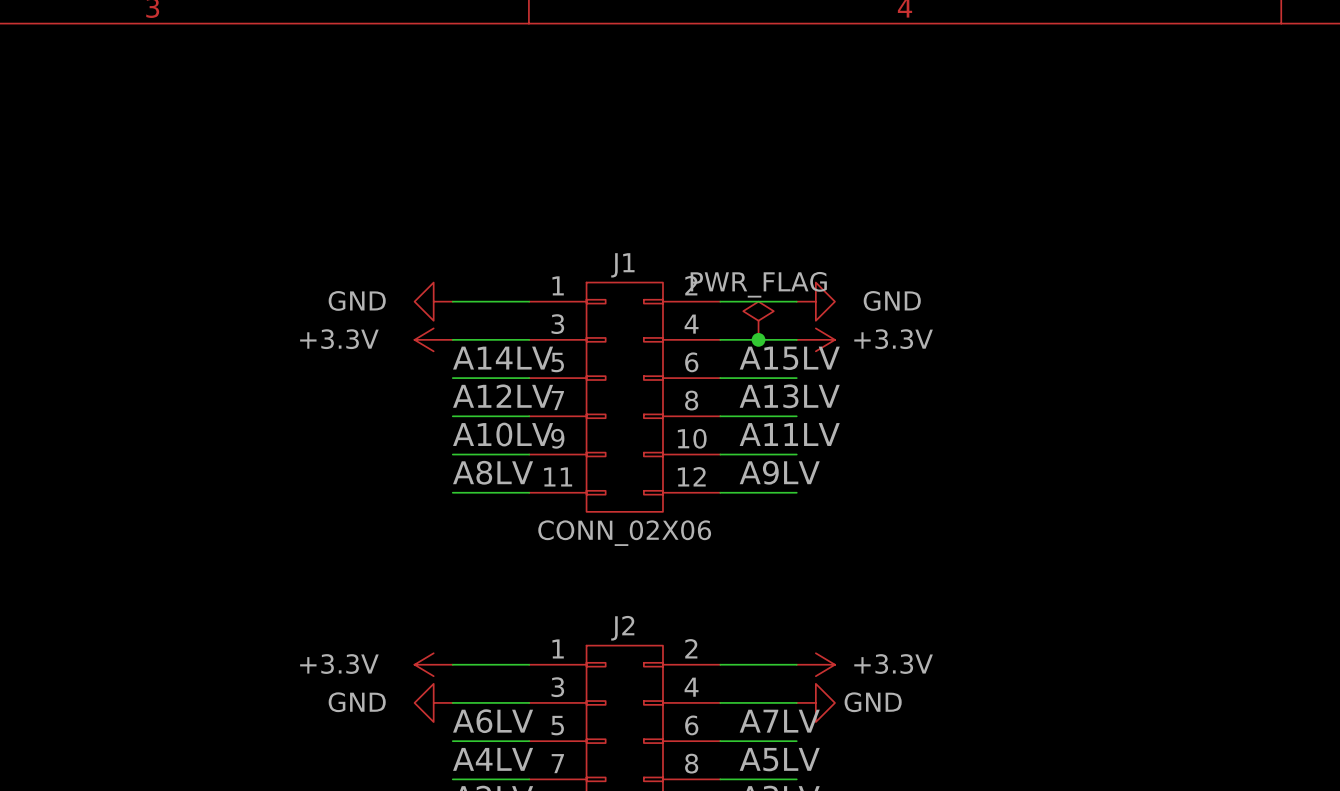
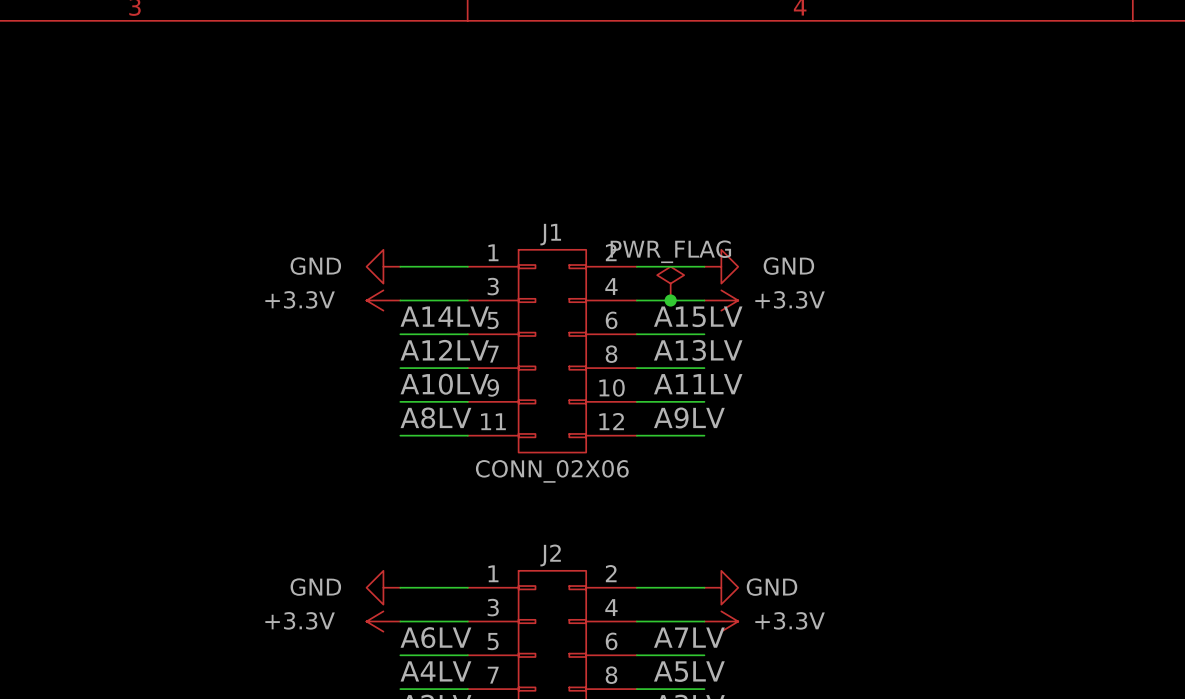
power symbol: +3.3V (433, 664) -> GND (383, 587)
power symbol: +3.3V (815, 664) -> GND (721, 587)
power symbol: GND (433, 702) -> +3.3V (383, 621)
power symbol: GND (815, 702) -> +3.3V (721, 621)

